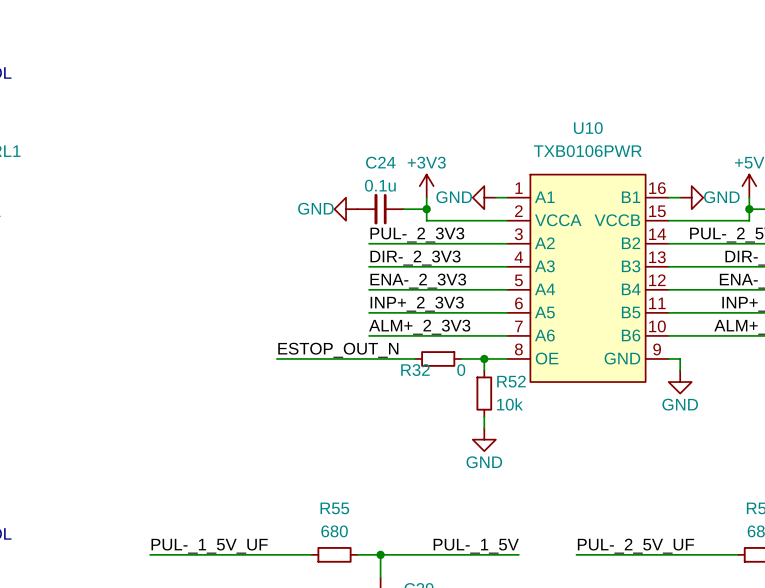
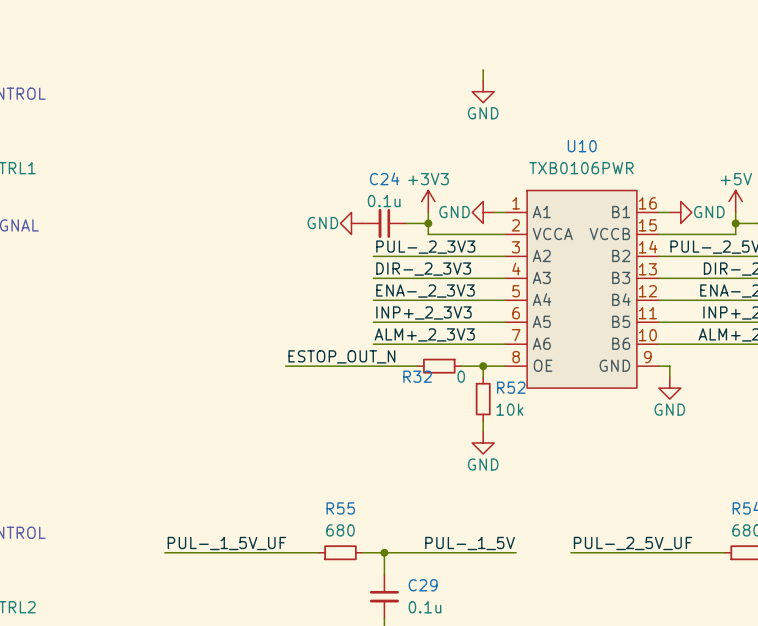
wire: none -> (483, 69) (483, 80)
power symbol: none -> GND (483, 91)

